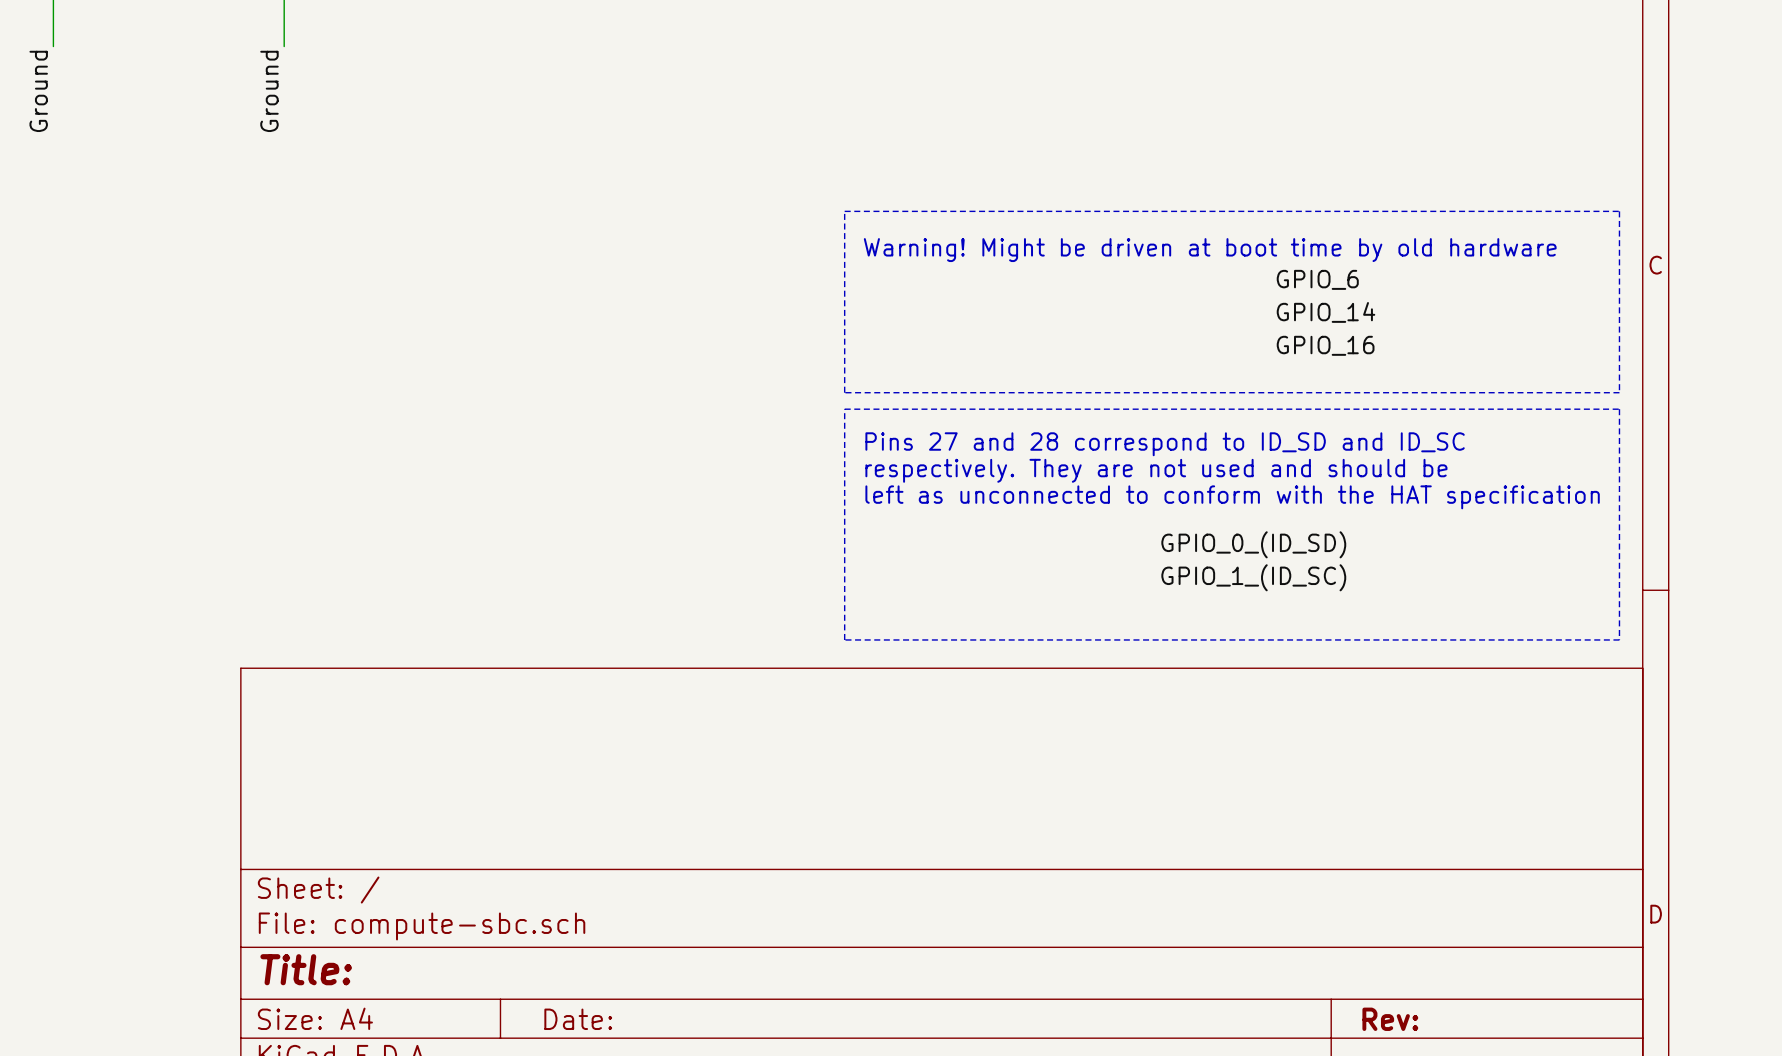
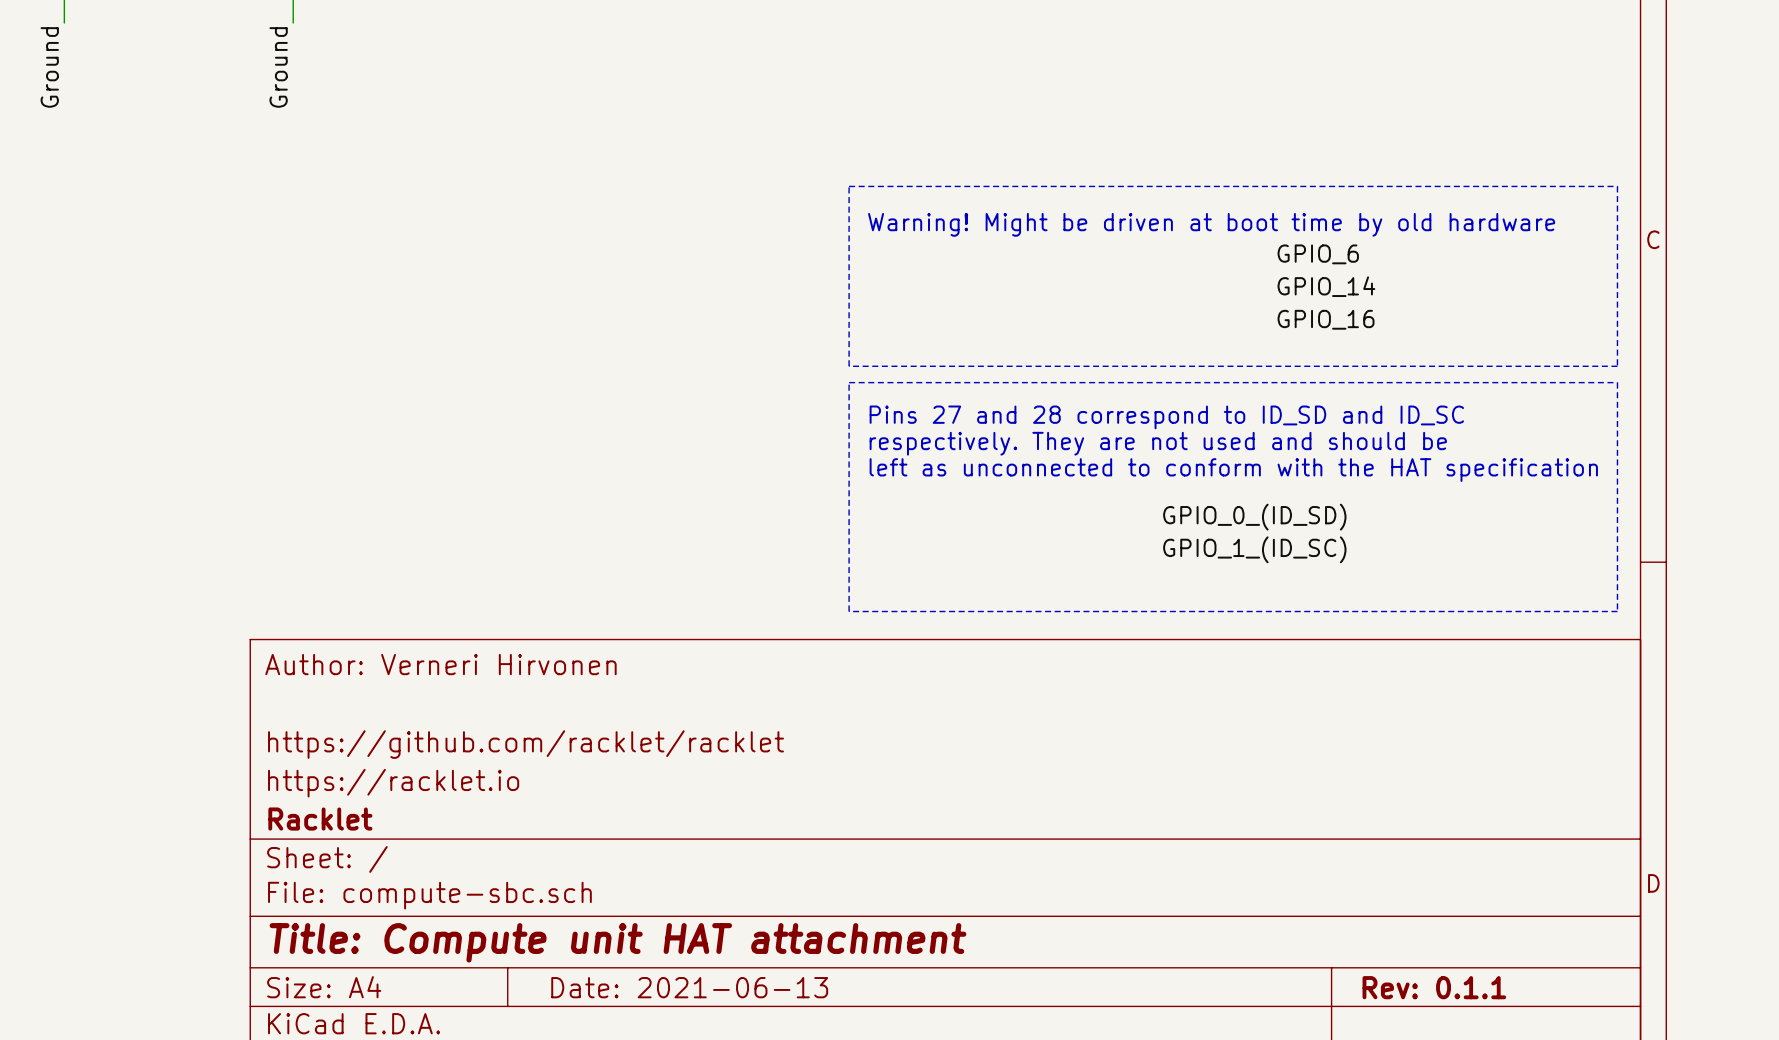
title block: none -> Author: Verneri Hirvonen (440, 664)
title block: none -> https://github.com/racklet/racklet (526, 744)
title block: none -> https://racklet.io (393, 783)
title block: none -> Racklet (320, 819)
title block: Title: (306, 969) -> Title: Compute unit HAT attachment (617, 942)
title block: Date: (578, 1019) -> Date: 2021-06-13 (689, 987)
title block: Rev: (1390, 1019) -> Rev: 0.1.1 (1434, 987)

